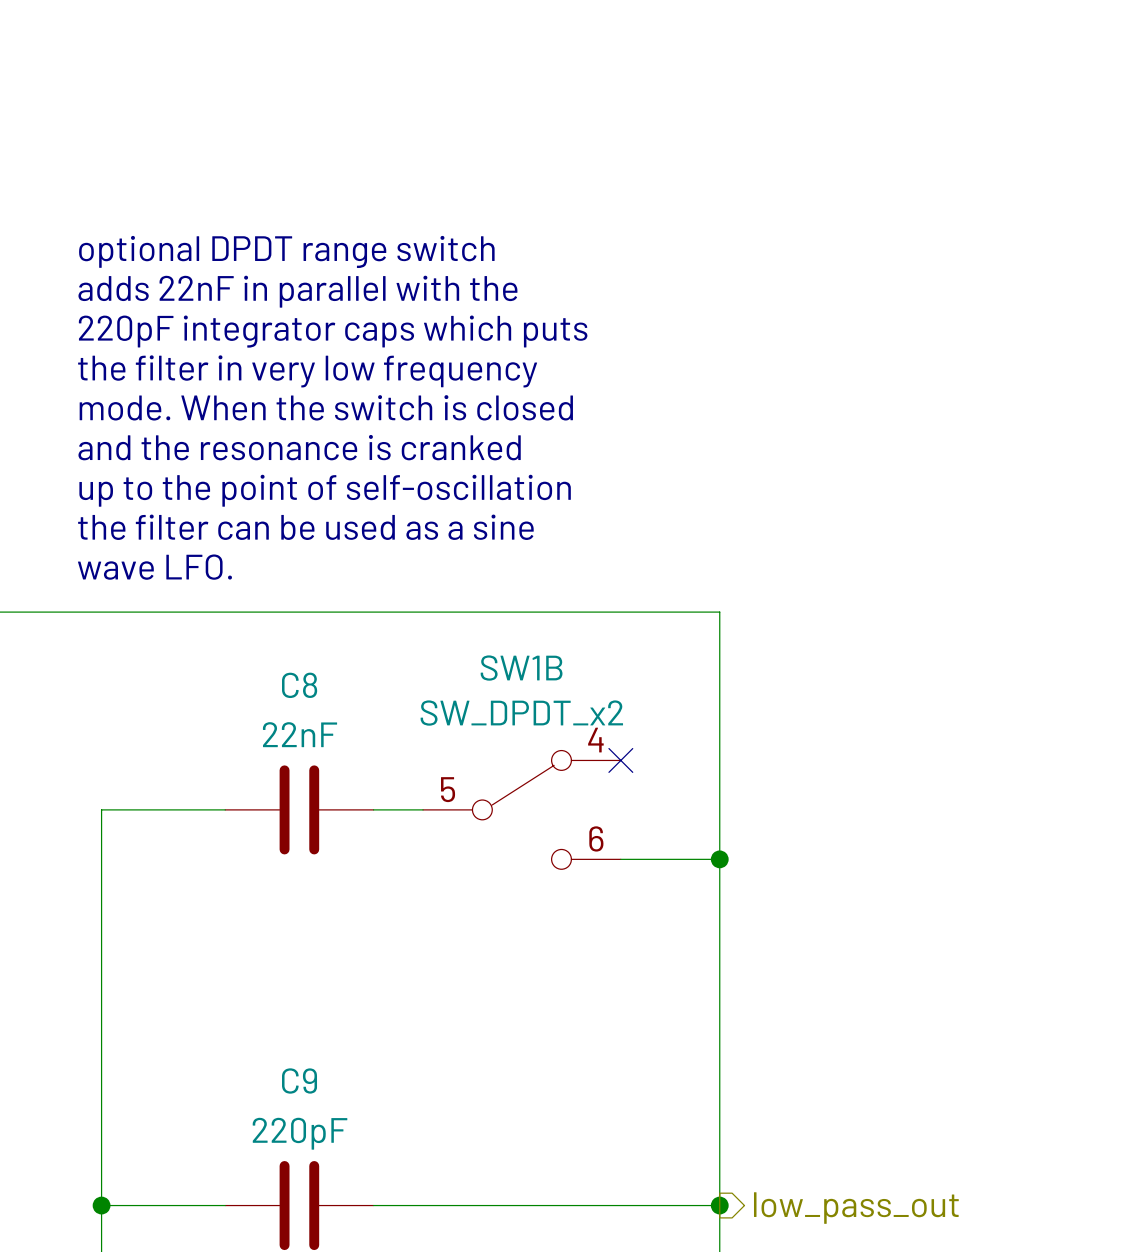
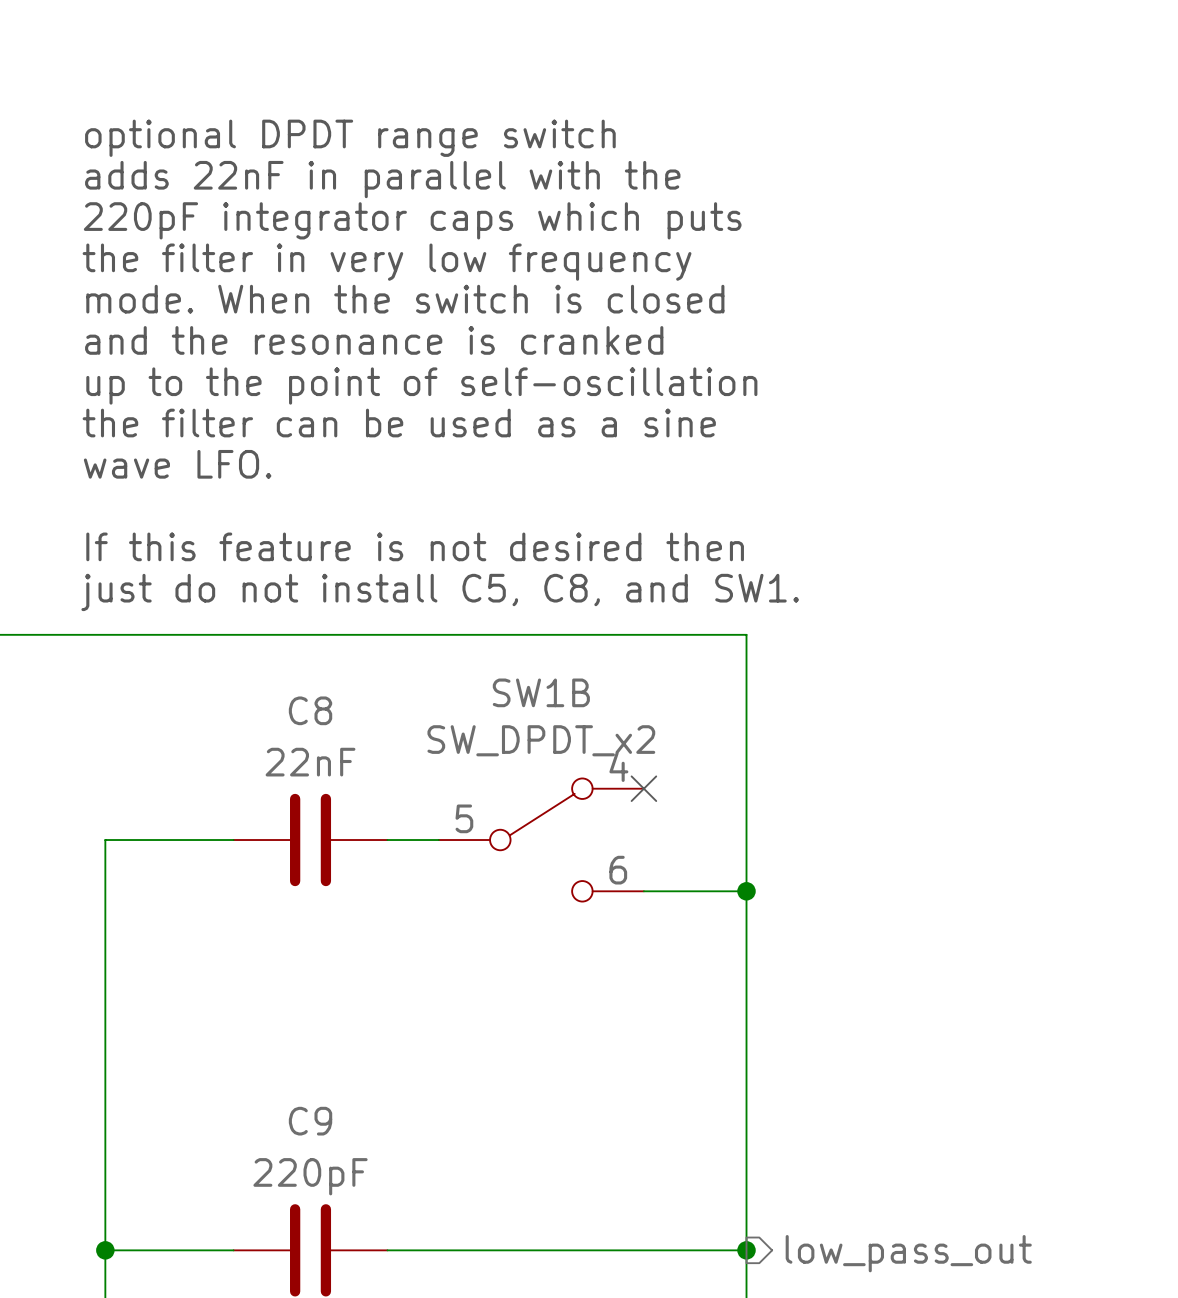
text: none -> optional DPDT range switch (350, 138)
text: none -> adds 22nF in parallel with the (382, 179)
text: none -> 220pF integrator caps which puts (412, 220)
text: optional DPDT range switch (286, 251) -> the filter in very low frequency (387, 262)
text: adds 22nF in parallel with the (297, 291) -> mode. When the switch is closed (405, 299)
text: 220pF integrator caps which puts (333, 331) -> and the resonance is cranked (374, 340)
text: the filter in very low frequency (307, 371) -> up to the point of self-oscillation (421, 386)
text: mode. When the switch is closed (326, 407) -> the filter can be used as a sine (399, 423)
text: and the resonance is cranked (299, 447) -> wave LFO. (177, 464)
text: up to the point of self-oscillation (325, 490) -> none
text: the filter can be used as a sine (305, 527) -> If this feature is not desired then (415, 546)
text: wave LFO. (154, 567) -> just do not install C5, C8, and SW1. (440, 592)

